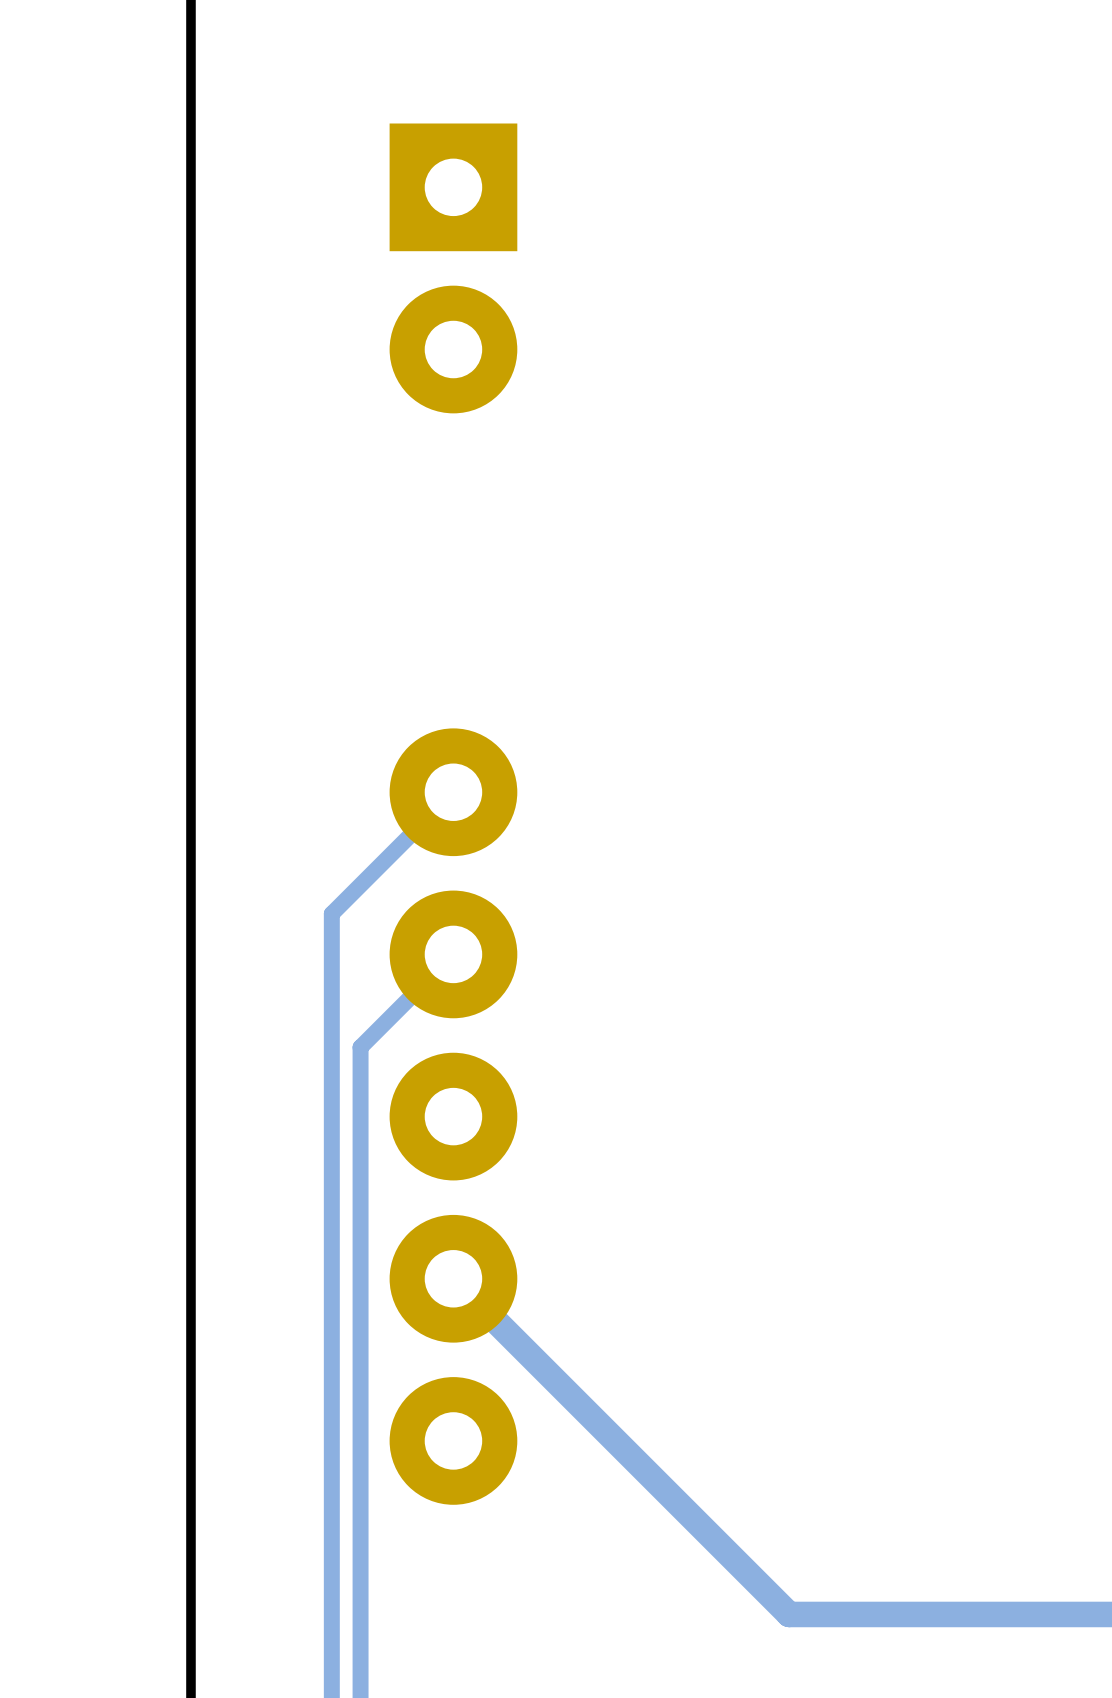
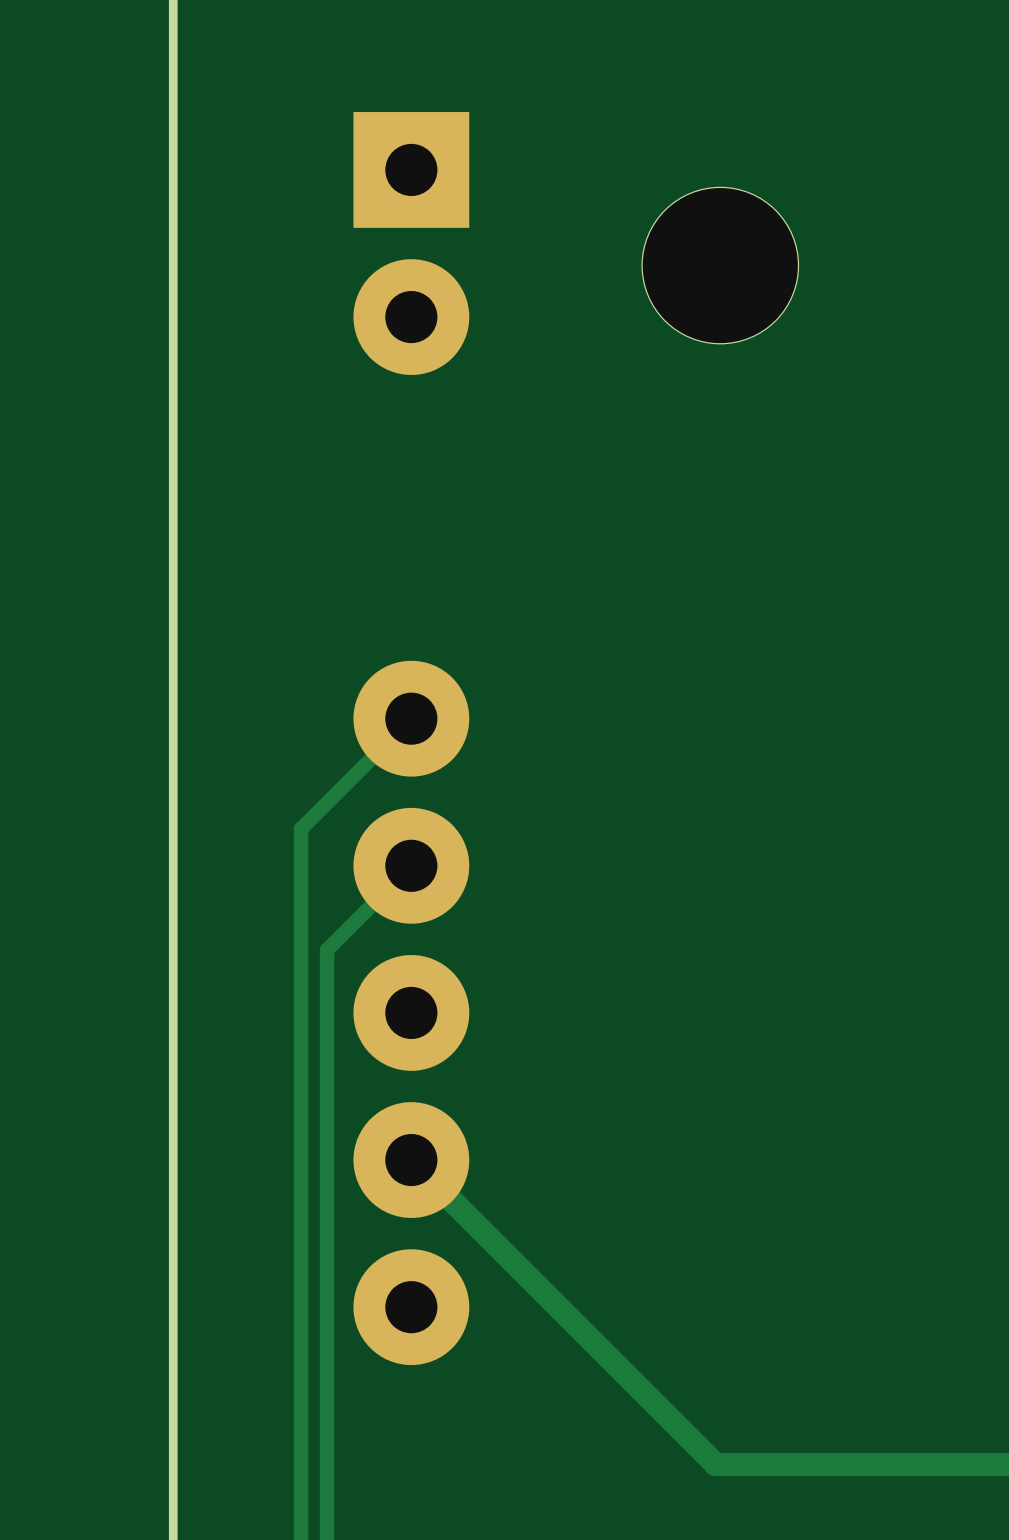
part: none -> (720, 265)

